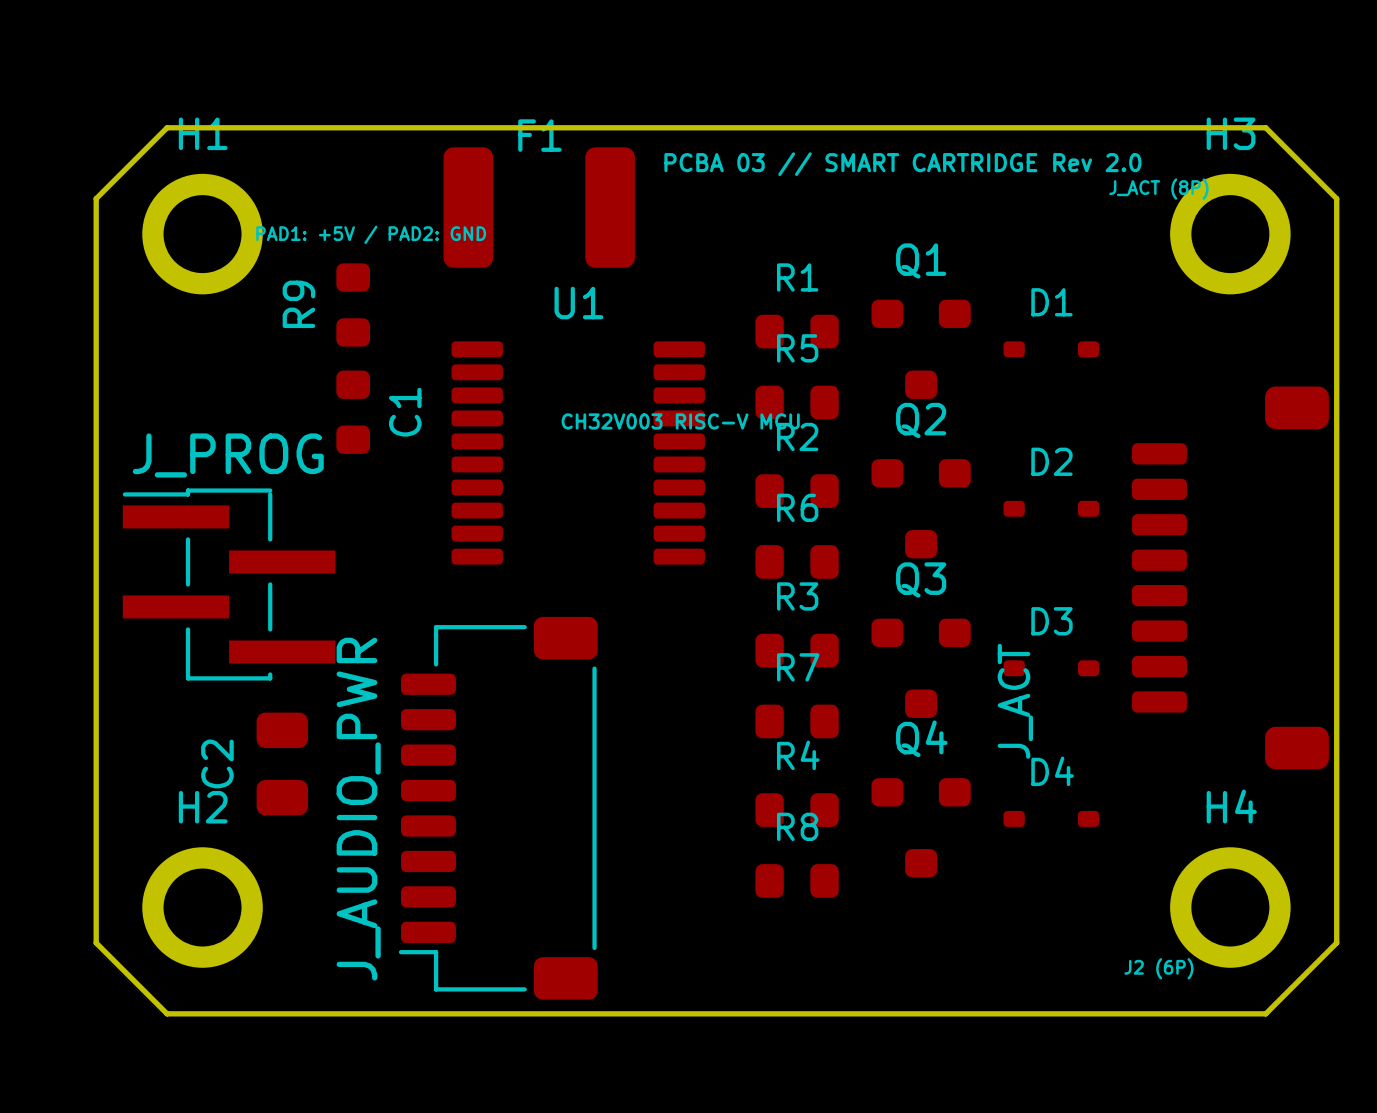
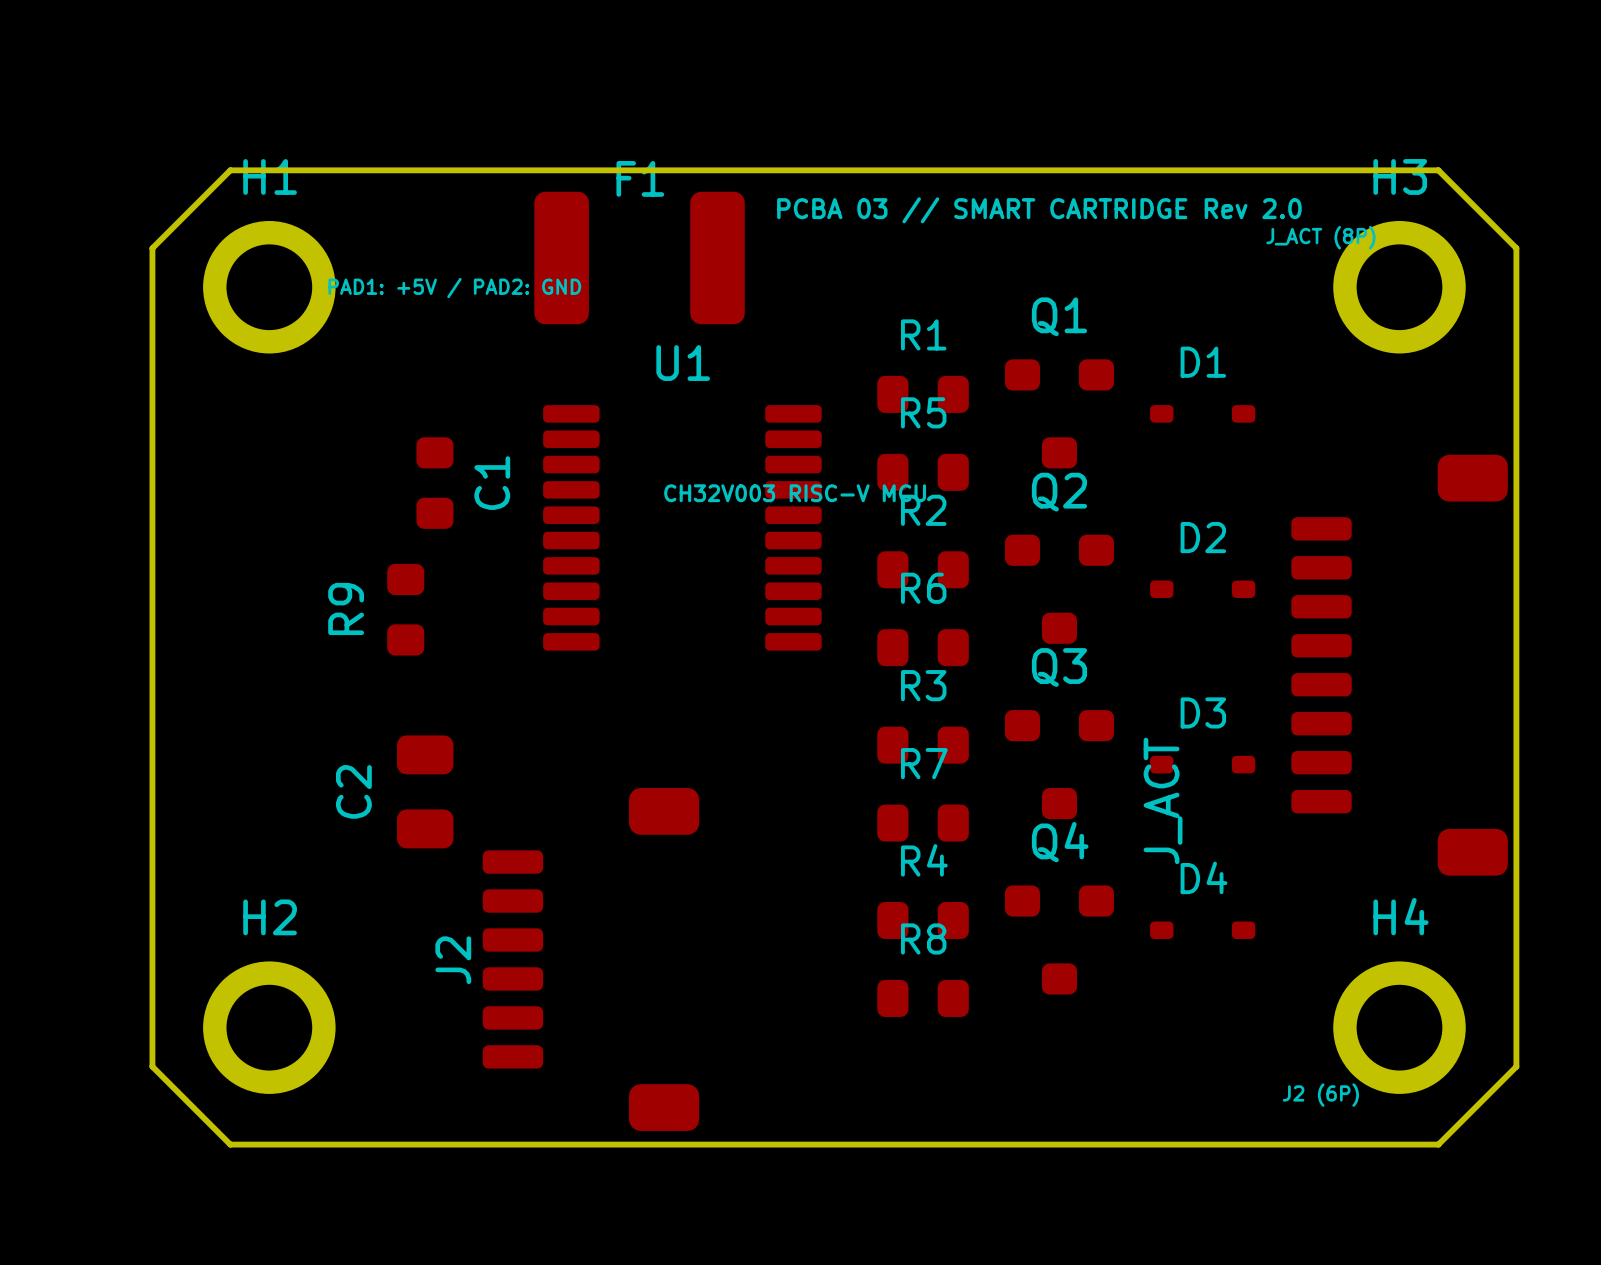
R9 position: (353, 305) -> (405, 609)
J_PROG: (229, 584) -> none
C2 position: (282, 763) -> (425, 791)
J_AUDIO_PWR: (498, 808) -> none
J2: none -> (590, 959)

